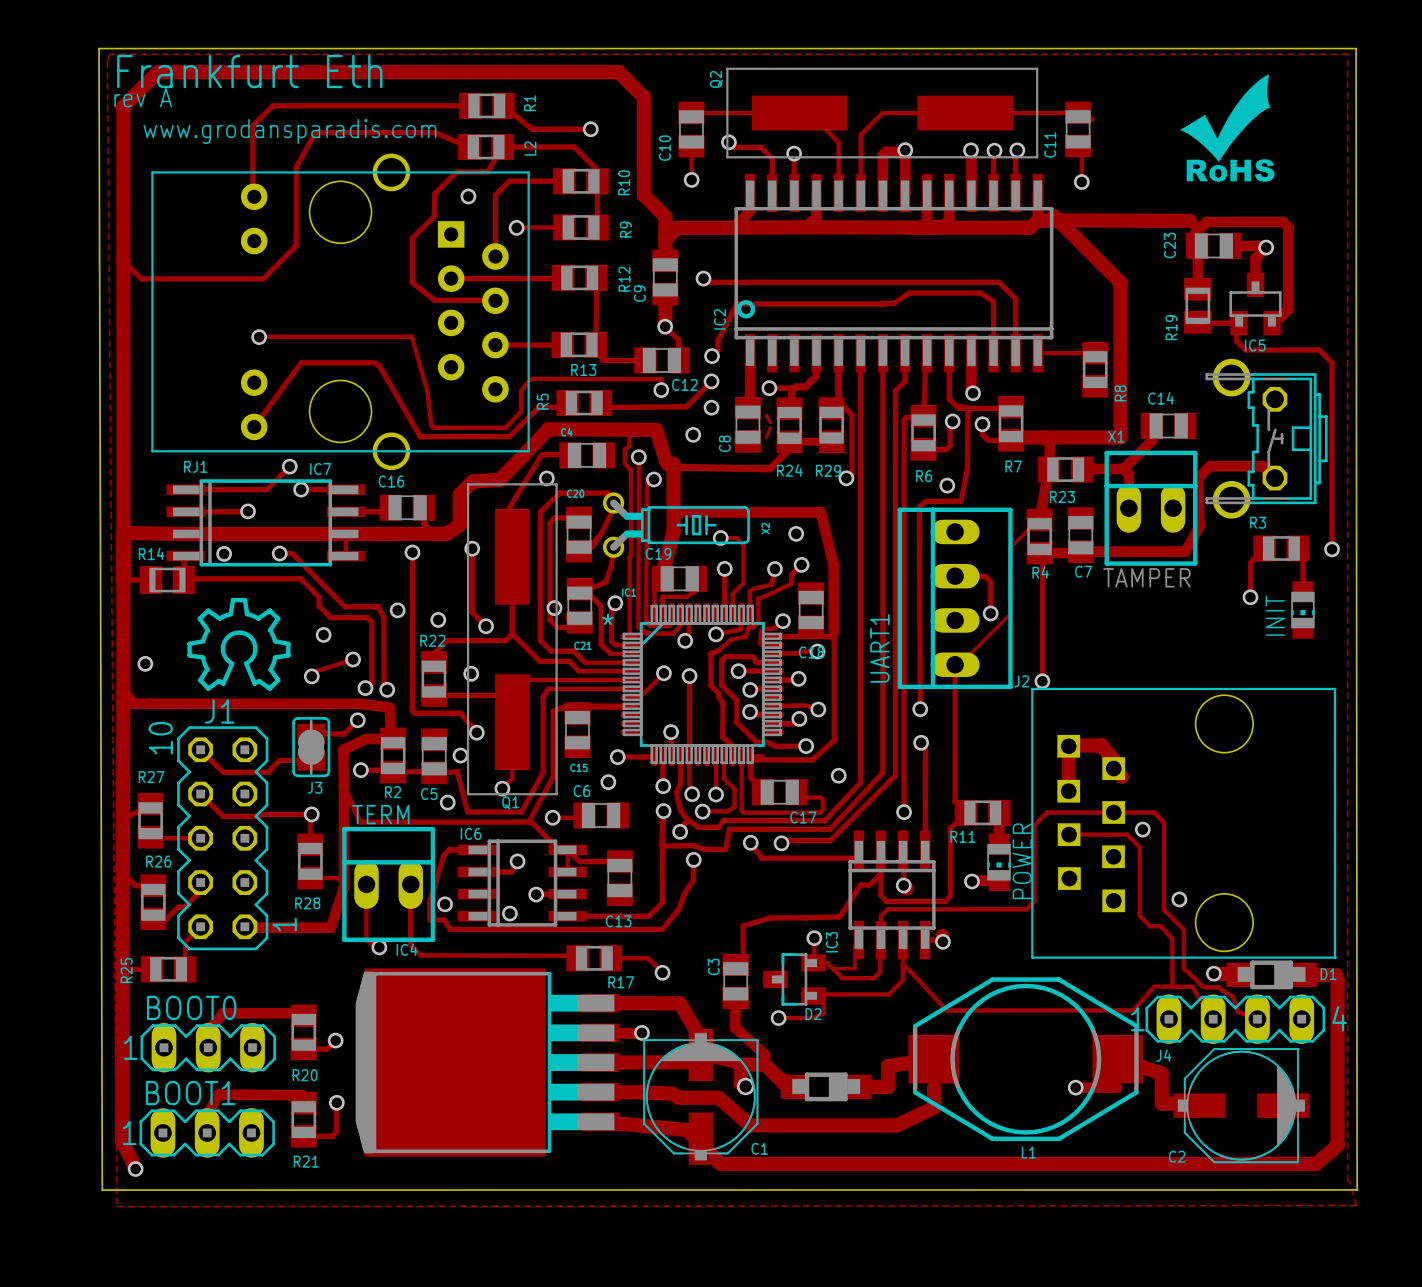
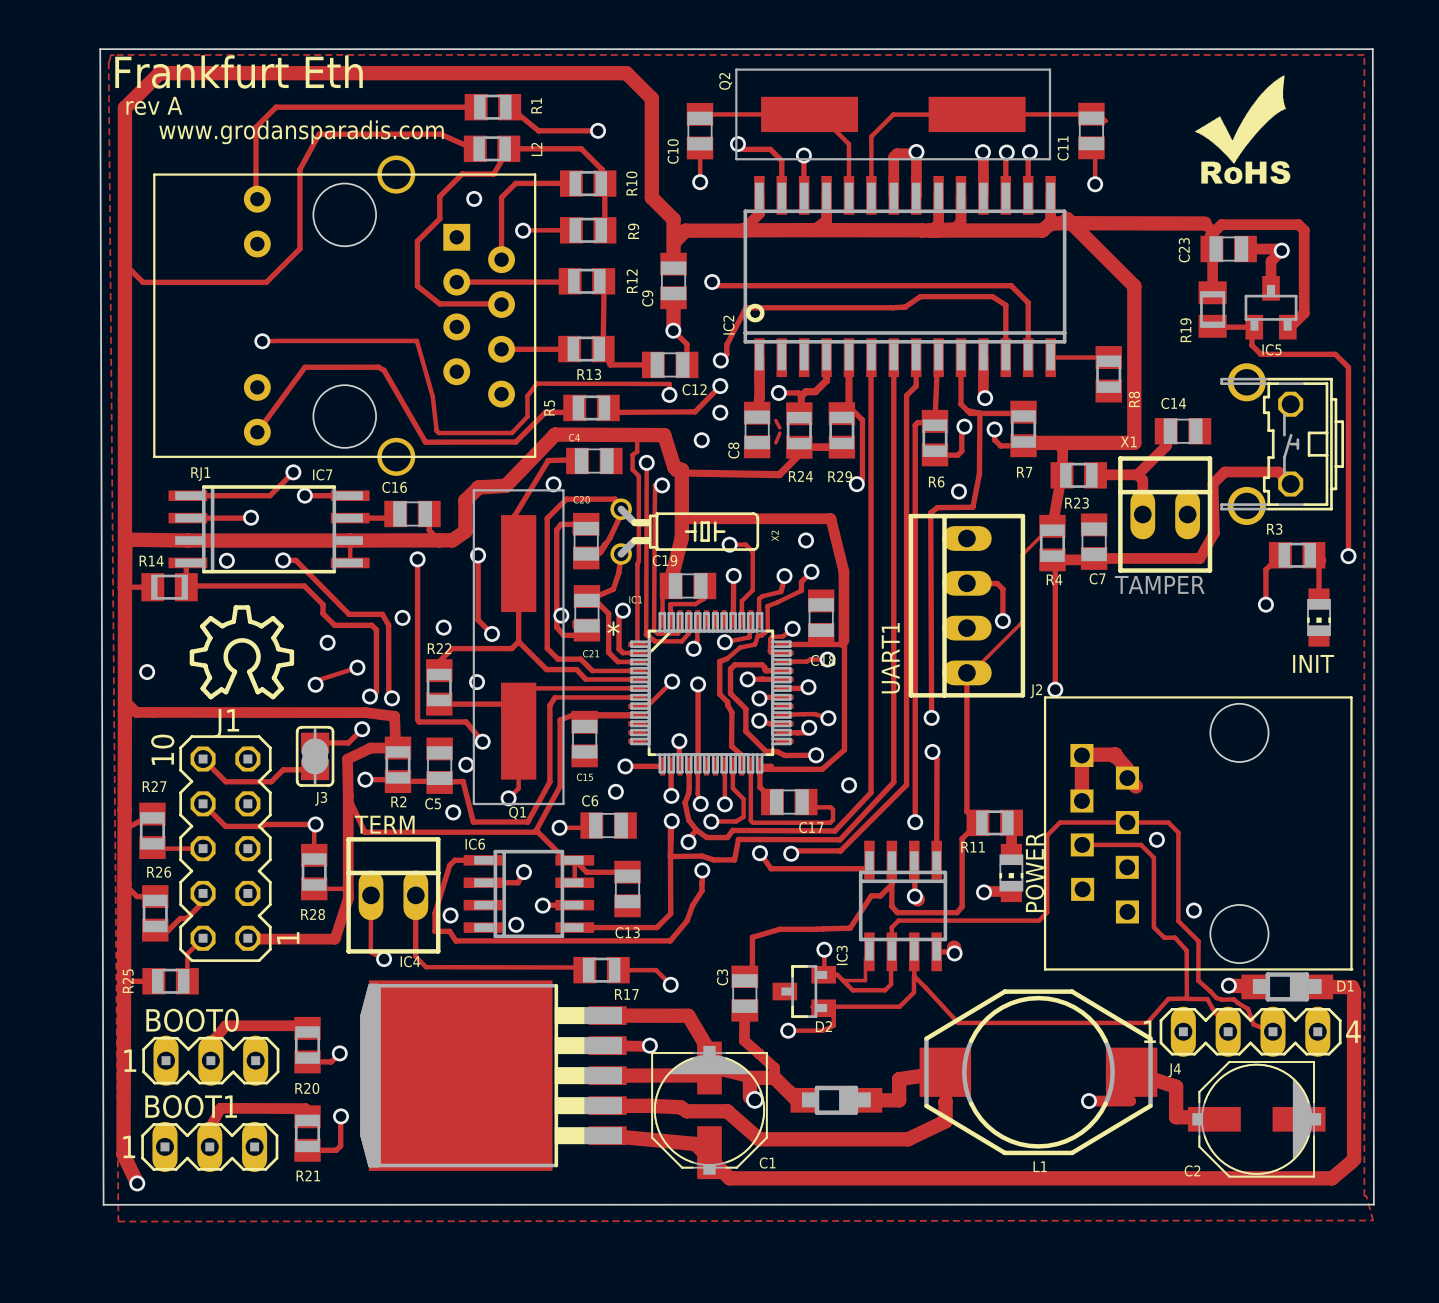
text position: rev A (143, 97) -> rev A (154, 105)
text rotation: 0° (1275, 615) -> 90° clockwise (1313, 663)

